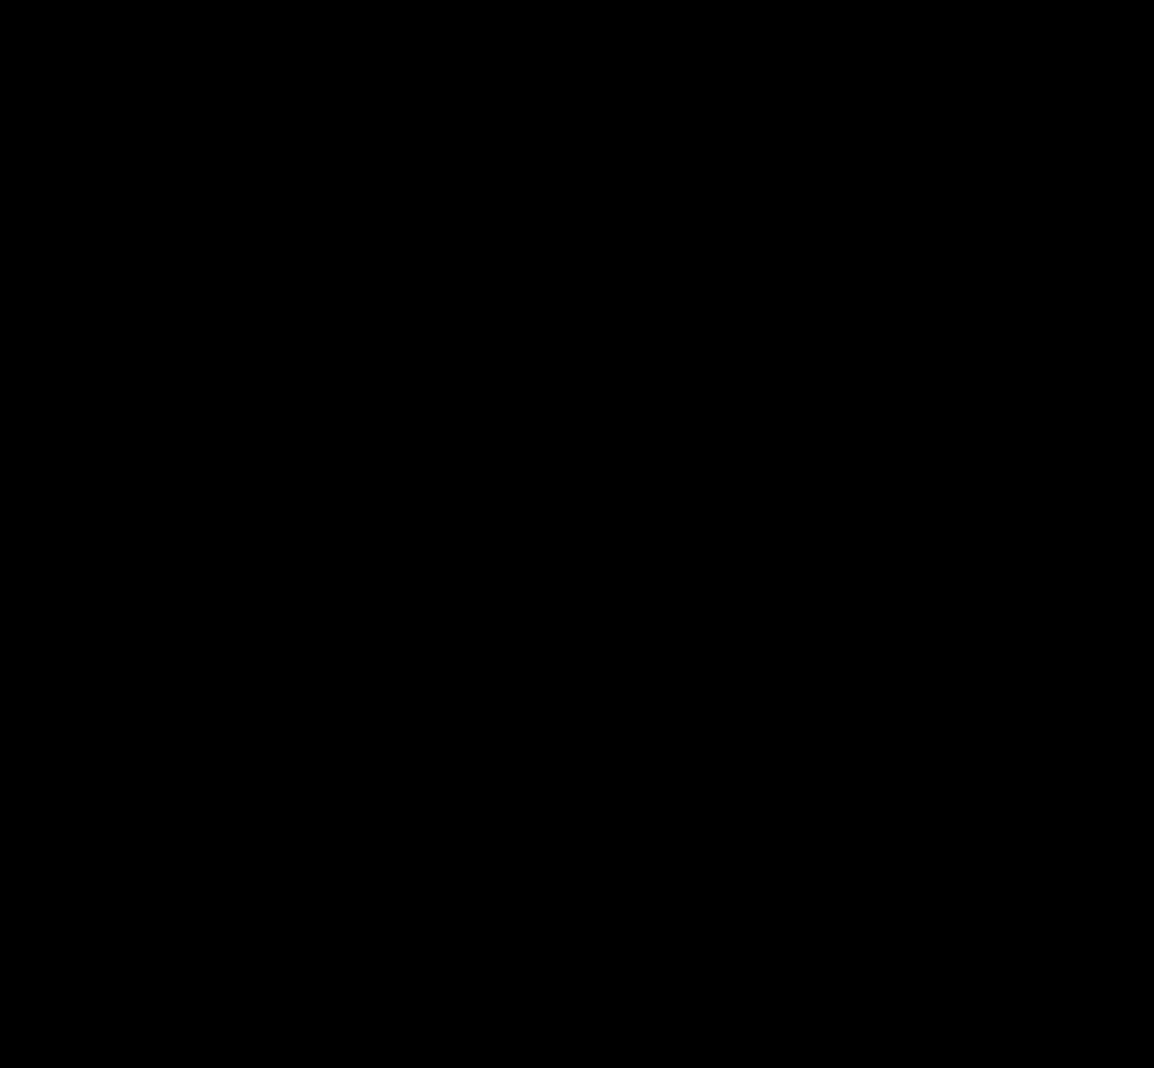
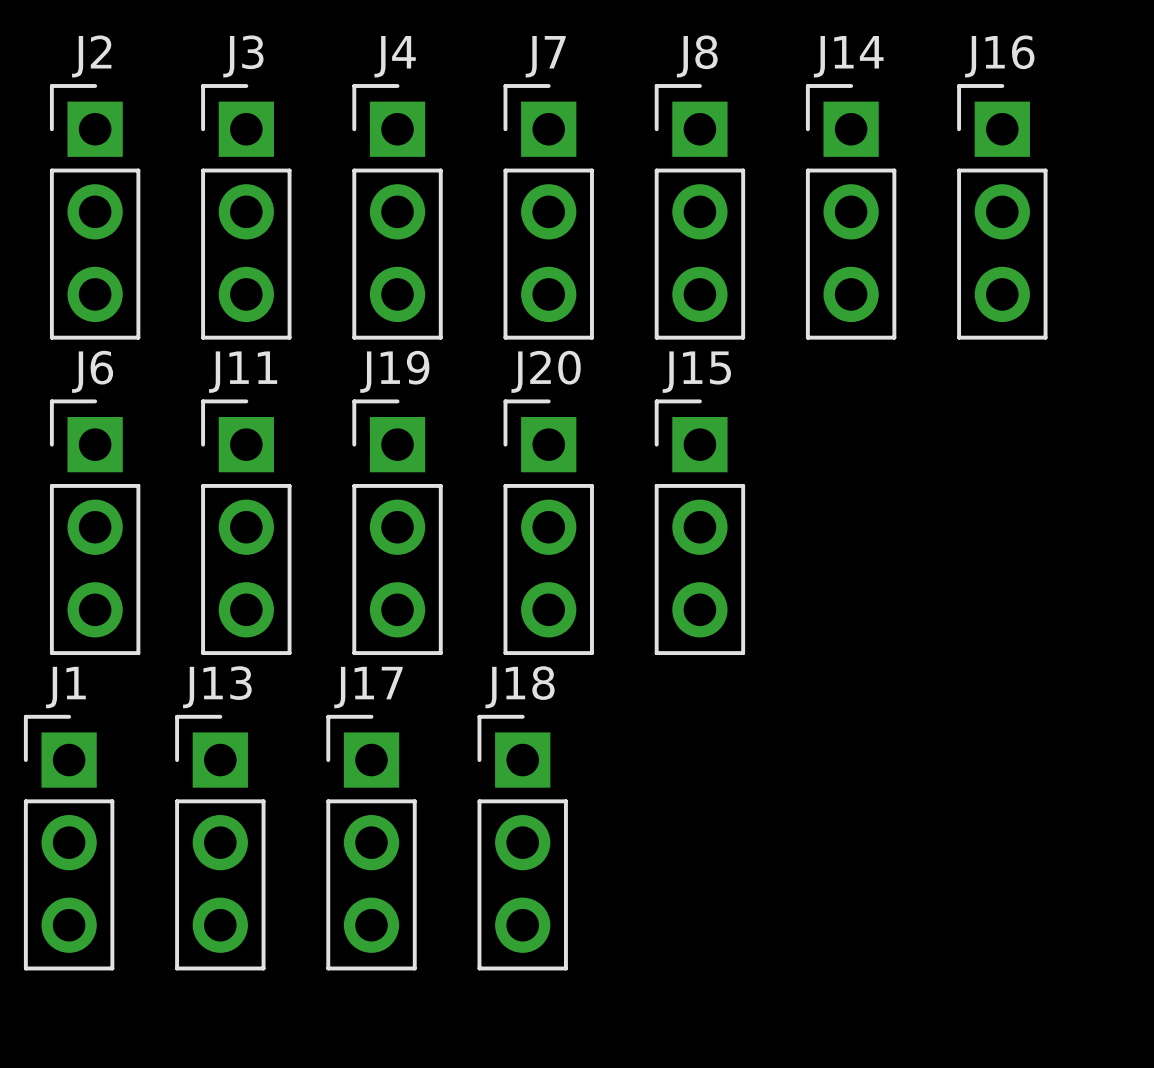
J2: none -> (95, 211)
J3: none -> (246, 211)
J4: none -> (397, 211)
J7: none -> (548, 211)
J8: none -> (699, 211)
J14: none -> (851, 211)
J16: none -> (1002, 211)
J6: none -> (95, 527)
J11: none -> (246, 527)
J19: none -> (397, 527)
J20: none -> (548, 527)
J15: none -> (699, 527)
J1: none -> (69, 842)
J13: none -> (220, 842)
J17: none -> (371, 842)
J18: none -> (522, 842)

